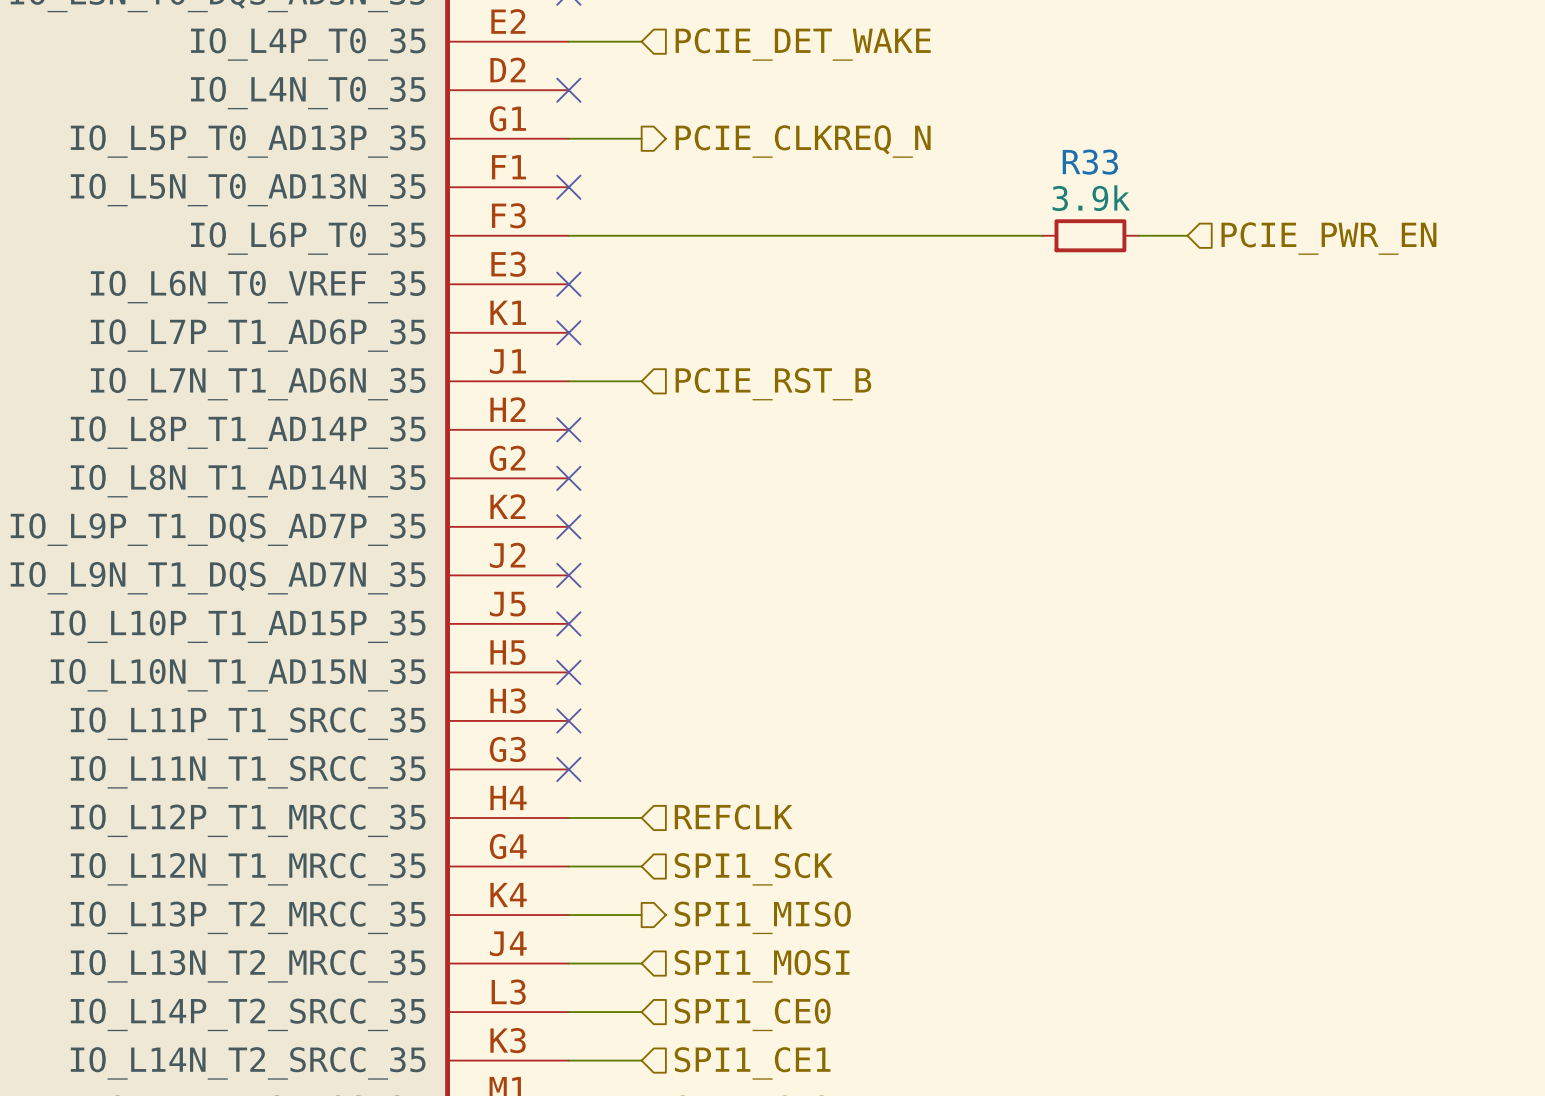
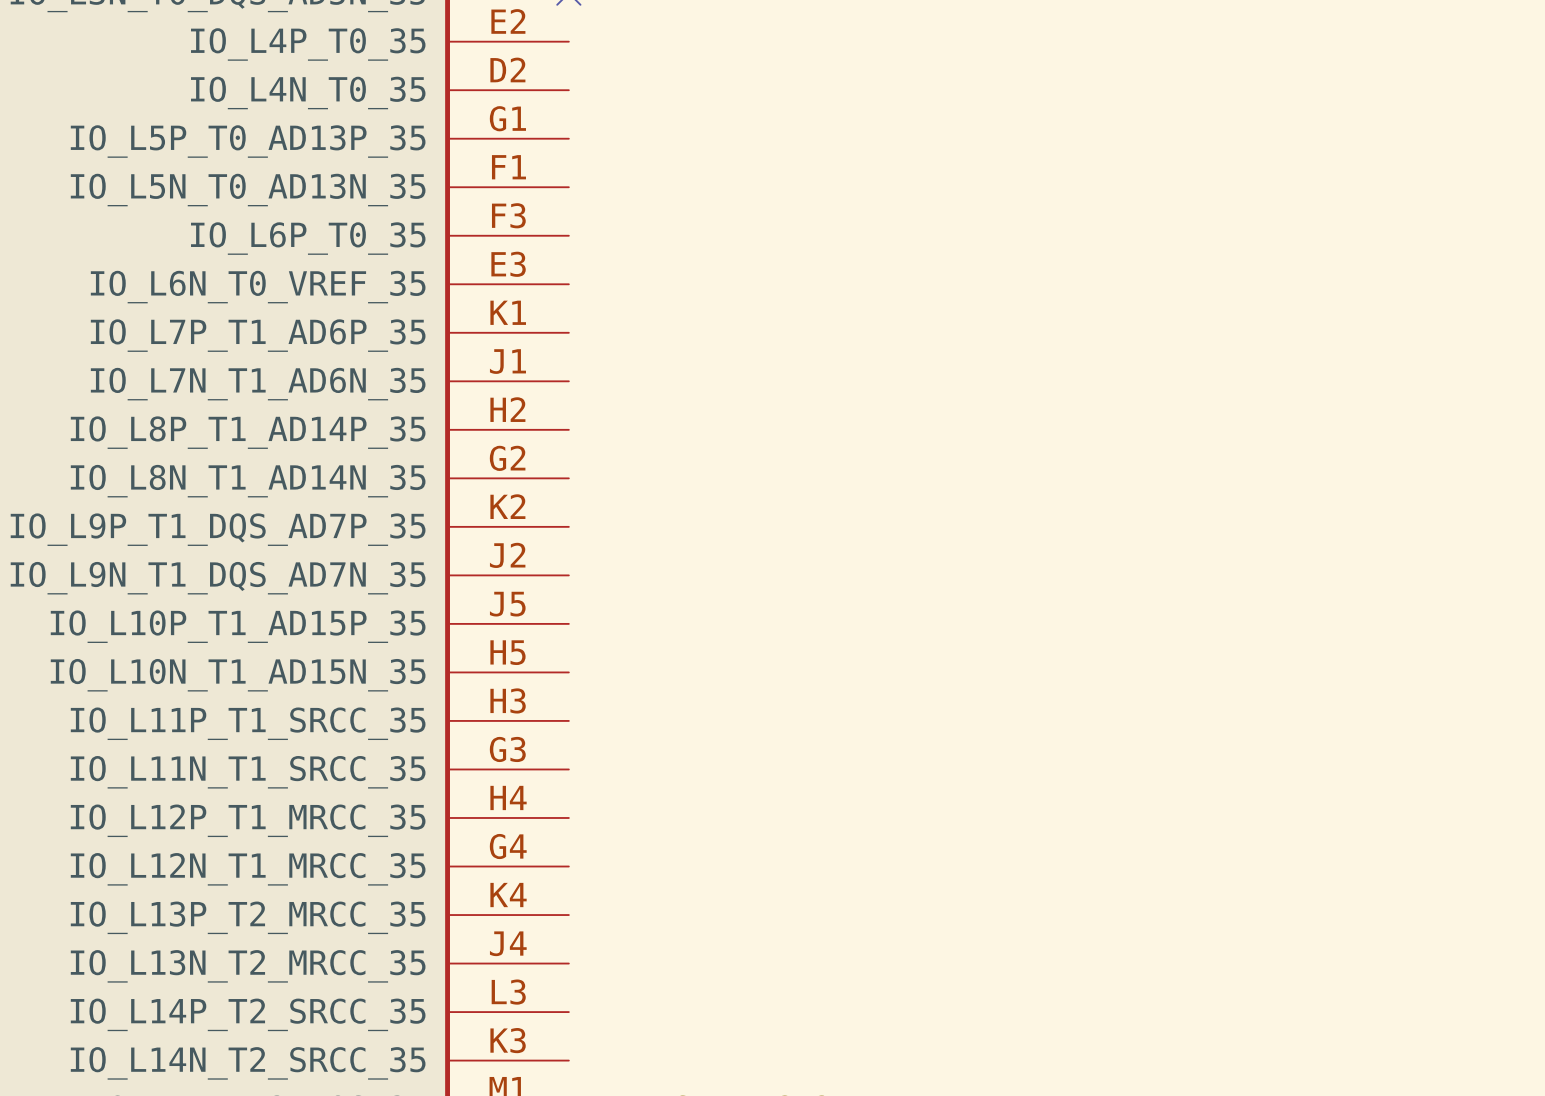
wire: (568, 41) (641, 41) -> none
hierarchical label: PCIE_DET_WAKE (803, 44) -> none
no-connect mark: (568, 90) -> none
wire: (568, 138) (641, 138) -> none
hierarchical label: PCIE_CLKREQ_N (803, 141) -> none
no-connect mark: (568, 187) -> none
wire: (568, 235) (1041, 235) -> none
R33: 3.9k (1090, 235) -> none
wire: (1138, 235) (1187, 235) -> none
hierarchical label: PCIE_PWR_EN (1328, 238) -> none
no-connect mark: (568, 284) -> none
no-connect mark: (568, 332) -> none
wire: (568, 381) (641, 381) -> none
hierarchical label: PCIE_RST_B (773, 384) -> none
no-connect mark: (568, 429) -> none
no-connect mark: (568, 478) -> none
no-connect mark: (568, 526) -> none
no-connect mark: (568, 575) -> none
no-connect mark: (568, 623) -> none
no-connect mark: (568, 672) -> none
no-connect mark: (568, 720) -> none
no-connect mark: (568, 769) -> none
wire: (568, 817) (641, 817) -> none
hierarchical label: REFCLK (733, 817) -> none
wire: (568, 866) (641, 866) -> none
hierarchical label: SPI1_SCK (753, 869) -> none
wire: (568, 915) (641, 915) -> none
hierarchical label: SPI1_MISO (762, 917) -> none
wire: (568, 963) (641, 963) -> none
hierarchical label: SPI1_MOSI (762, 966) -> none
wire: (568, 1012) (641, 1012) -> none
hierarchical label: SPI1_CE0 (752, 1014) -> none
wire: (568, 1060) (641, 1060) -> none
hierarchical label: SPI1_CE1 (752, 1063) -> none

